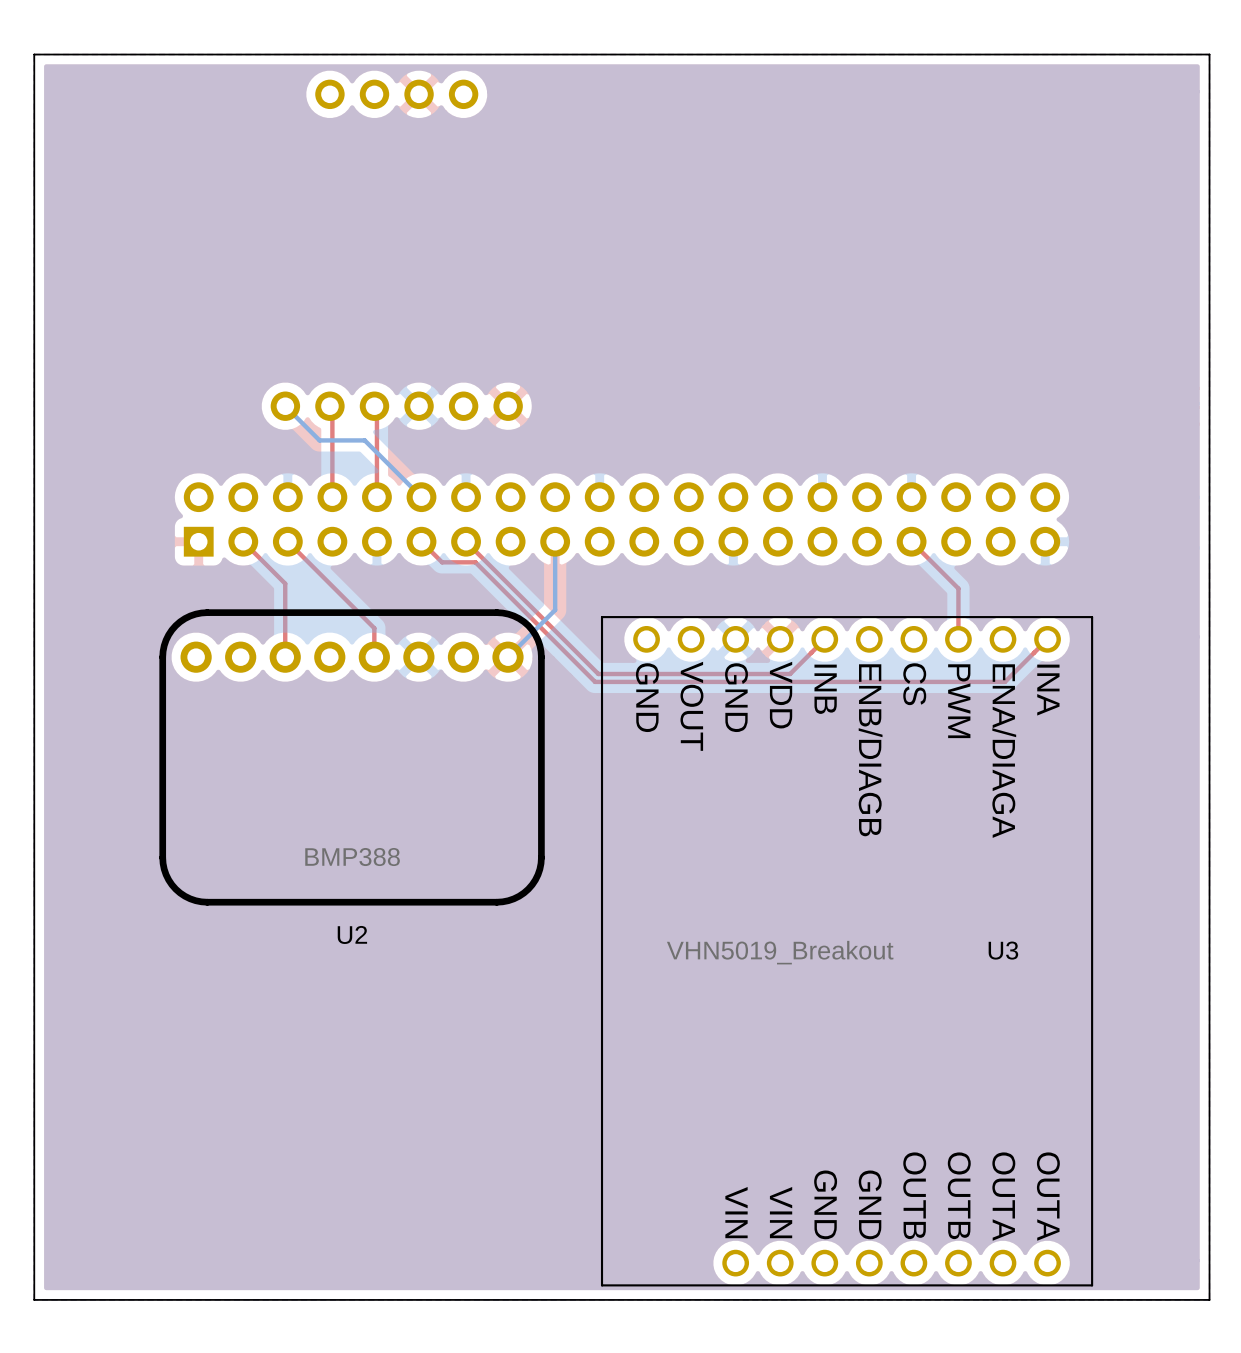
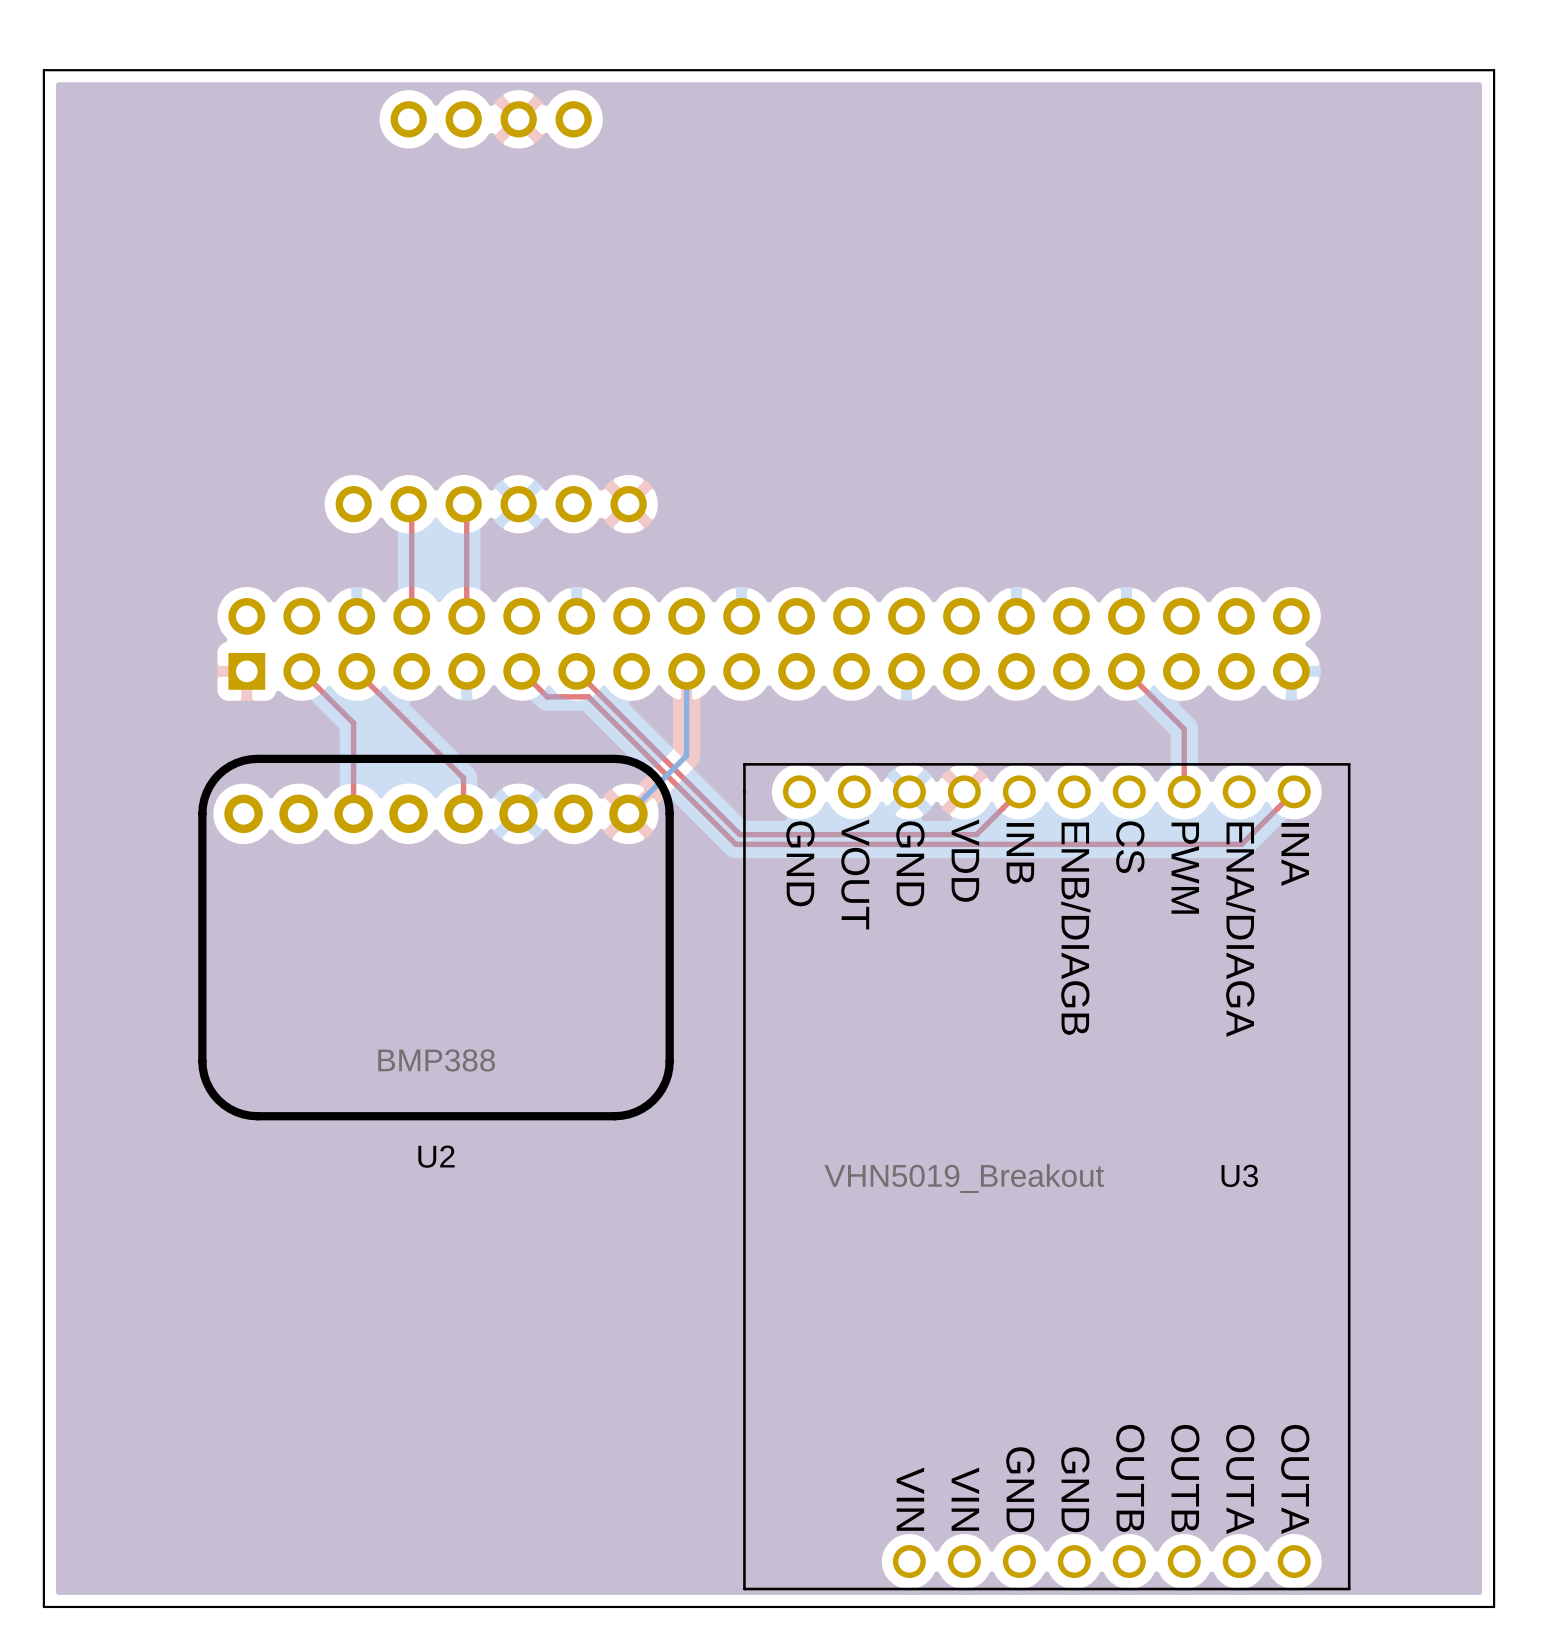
bottom track: (285, 406) (319, 440) (364, 440) (421, 497) -> none

